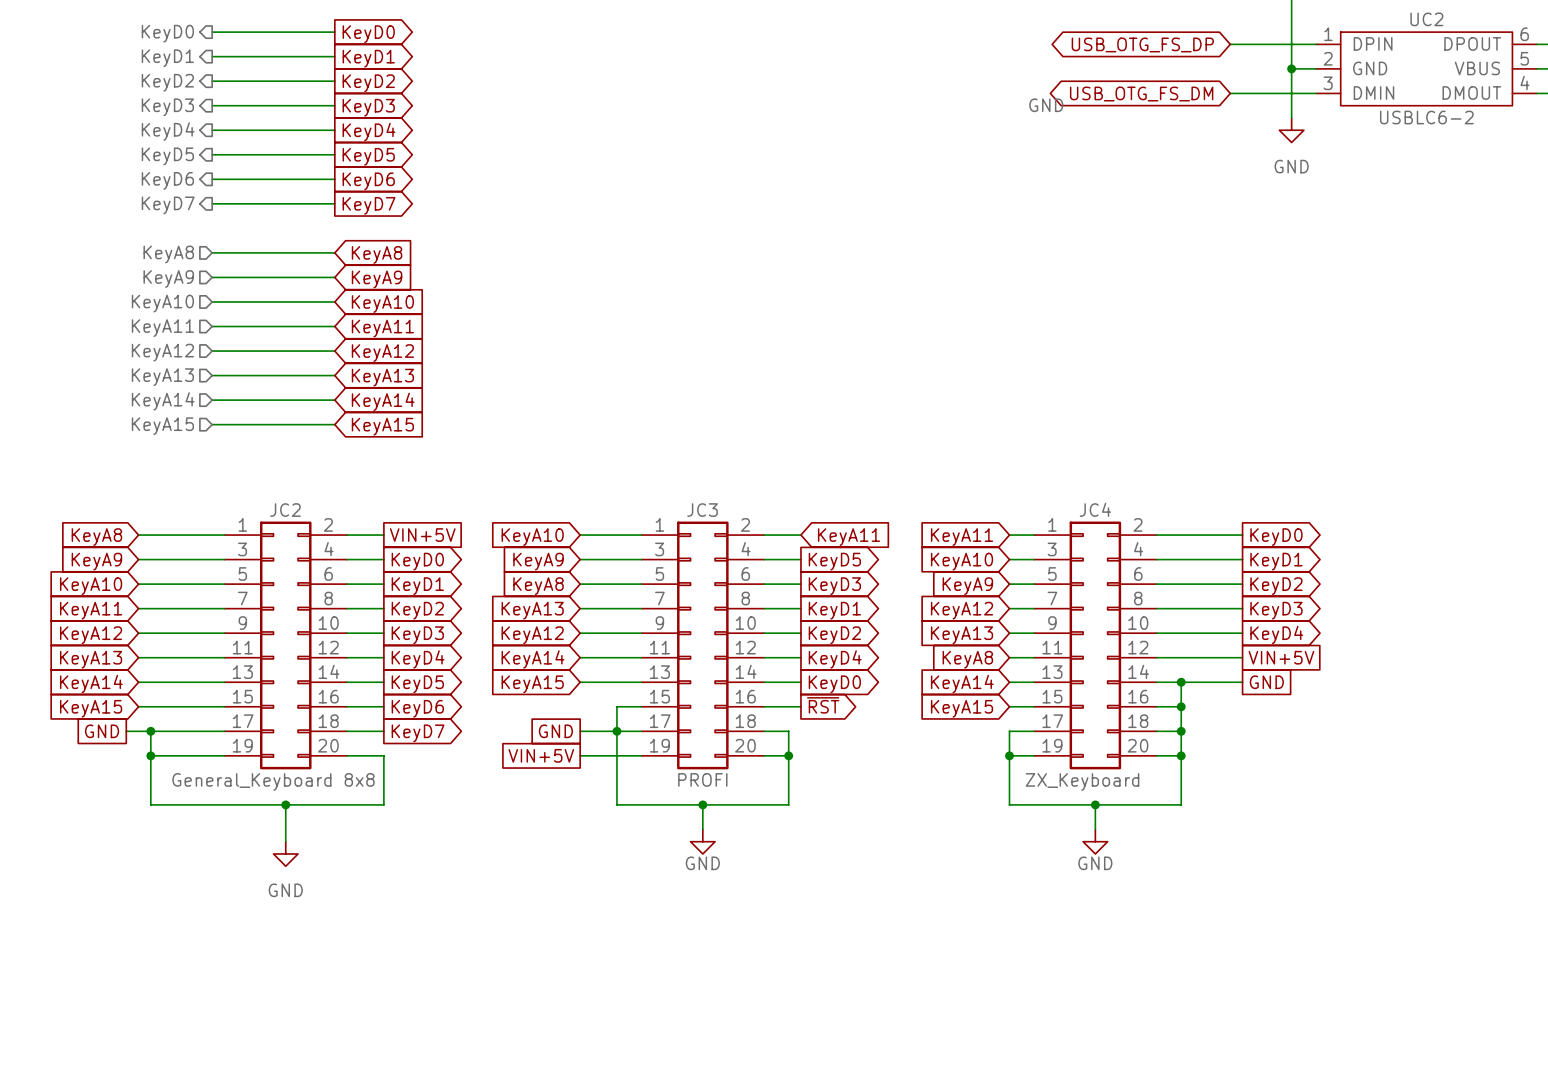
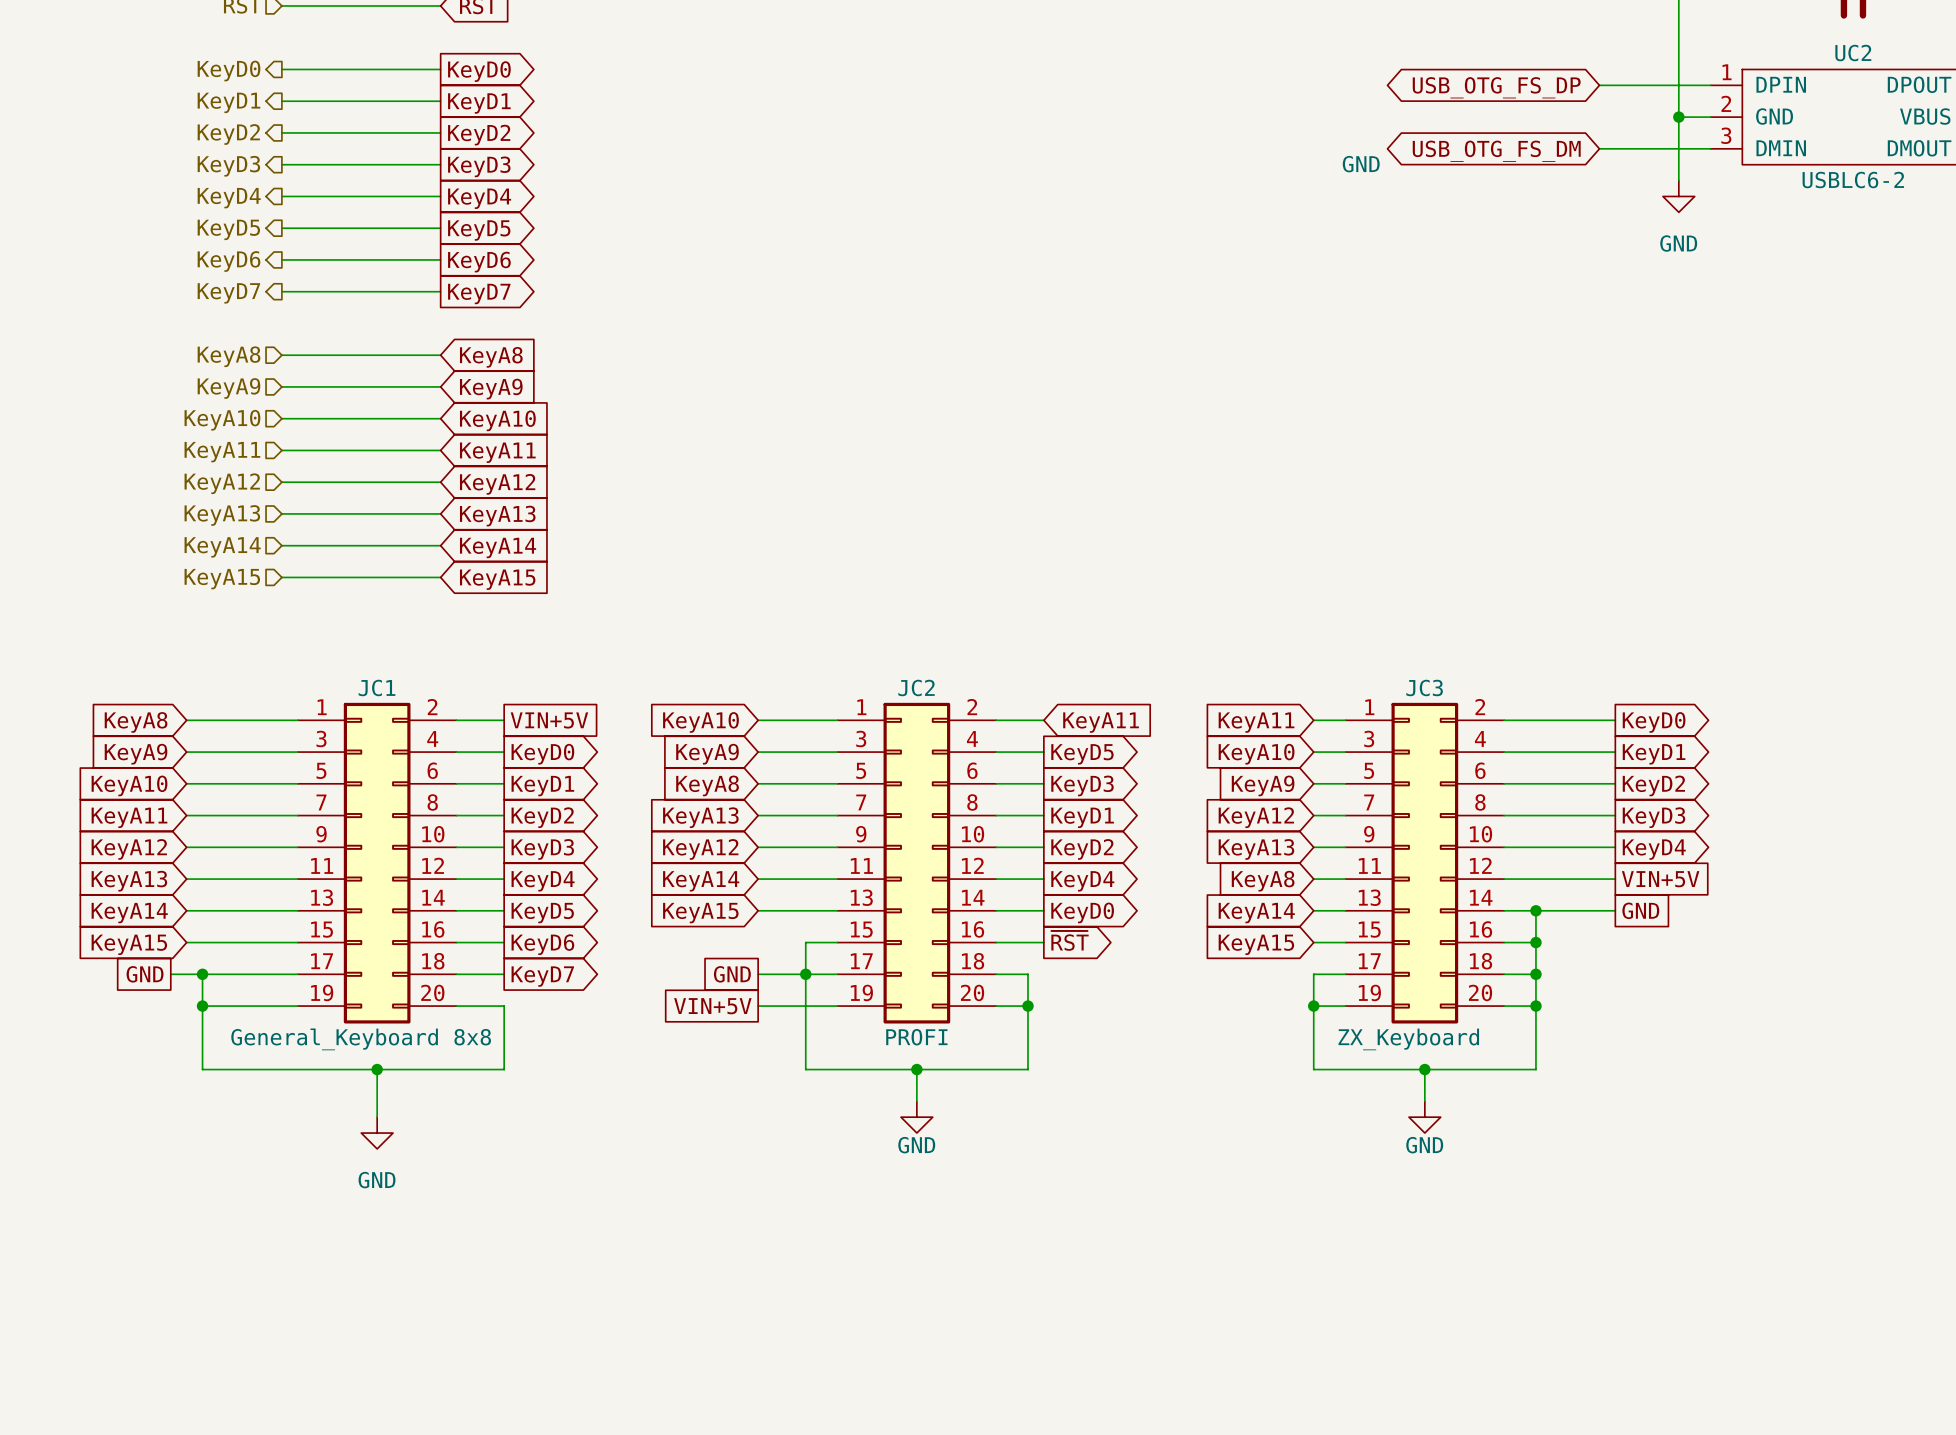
JC4 name: JC4 (1095, 509) -> JC3 (1424, 687)
JC2 name: JC2 (285, 510) -> JC1 (376, 687)
JC3 name: JC3 (702, 510) -> JC2 (916, 687)

